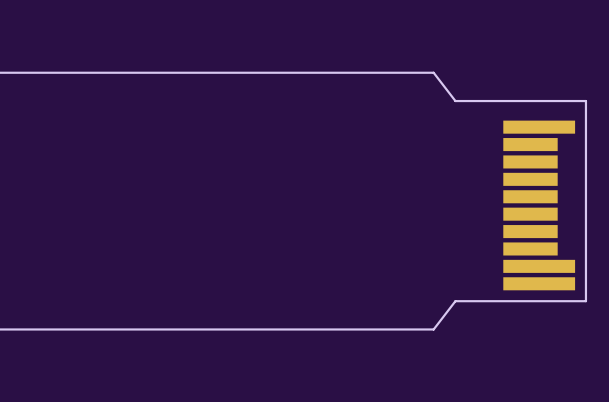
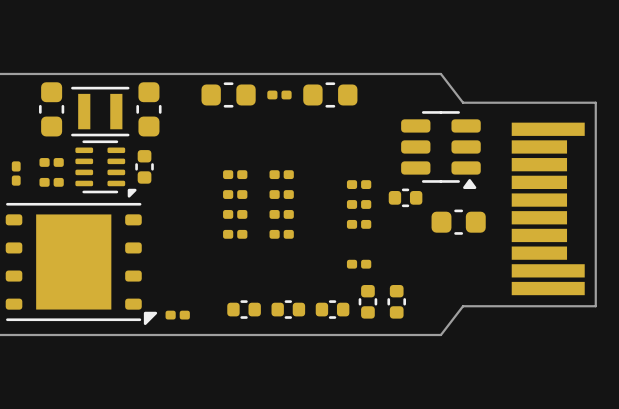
part: none -> (228, 94)
part: none -> (279, 94)
part: none -> (330, 94)
part: none -> (51, 109)
part: none -> (148, 109)
part: none -> (100, 111)
part: none -> (440, 150)
part: none -> (51, 162)
part: none -> (144, 166)
part: none -> (105, 169)
part: none -> (16, 173)
part: none -> (235, 174)
part: none -> (281, 174)
part: none -> (51, 182)
part: none -> (359, 184)
part: none -> (235, 194)
part: none -> (281, 194)
part: none -> (405, 197)
part: none -> (359, 204)
part: none -> (235, 214)
part: none -> (281, 214)
part: none -> (458, 222)
part: none -> (359, 224)
part: none -> (235, 234)
part: none -> (281, 234)
part: none -> (81, 263)
part: none -> (359, 264)
part: none -> (367, 301)
part: none -> (396, 301)
part: none -> (244, 309)
part: none -> (288, 309)
part: none -> (332, 309)
part: none -> (177, 315)

